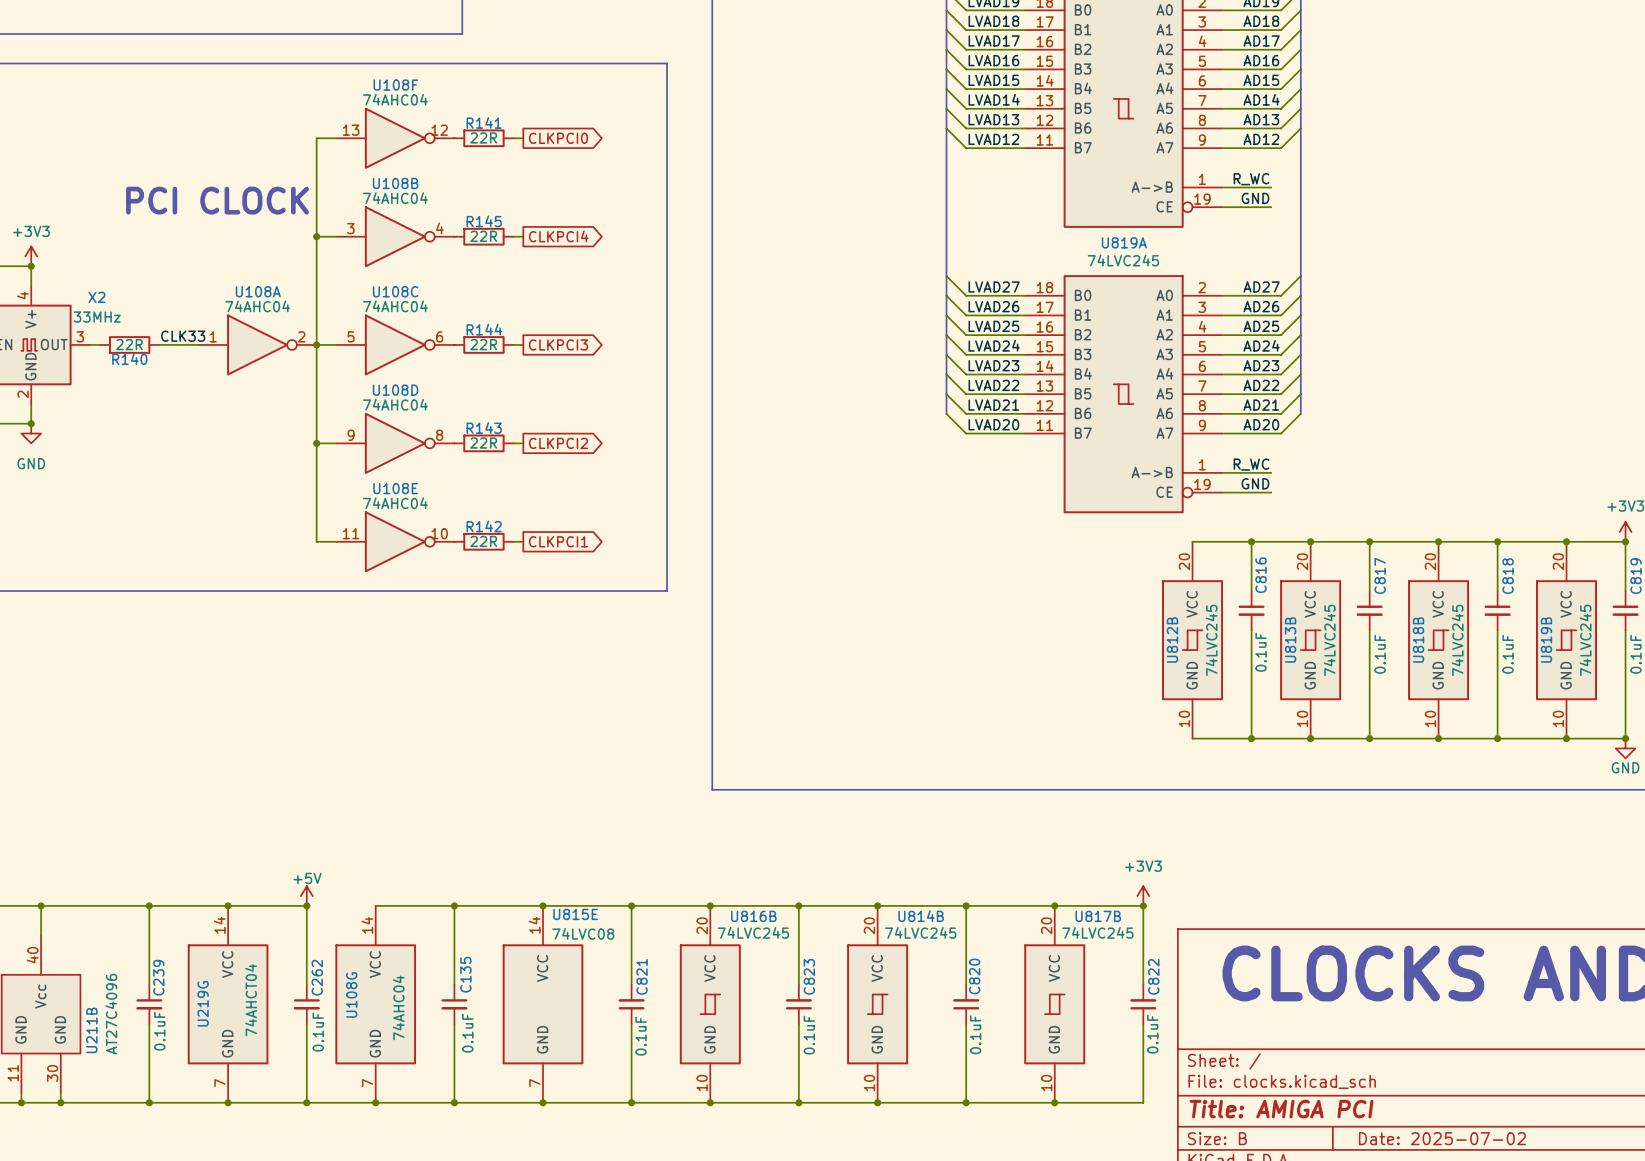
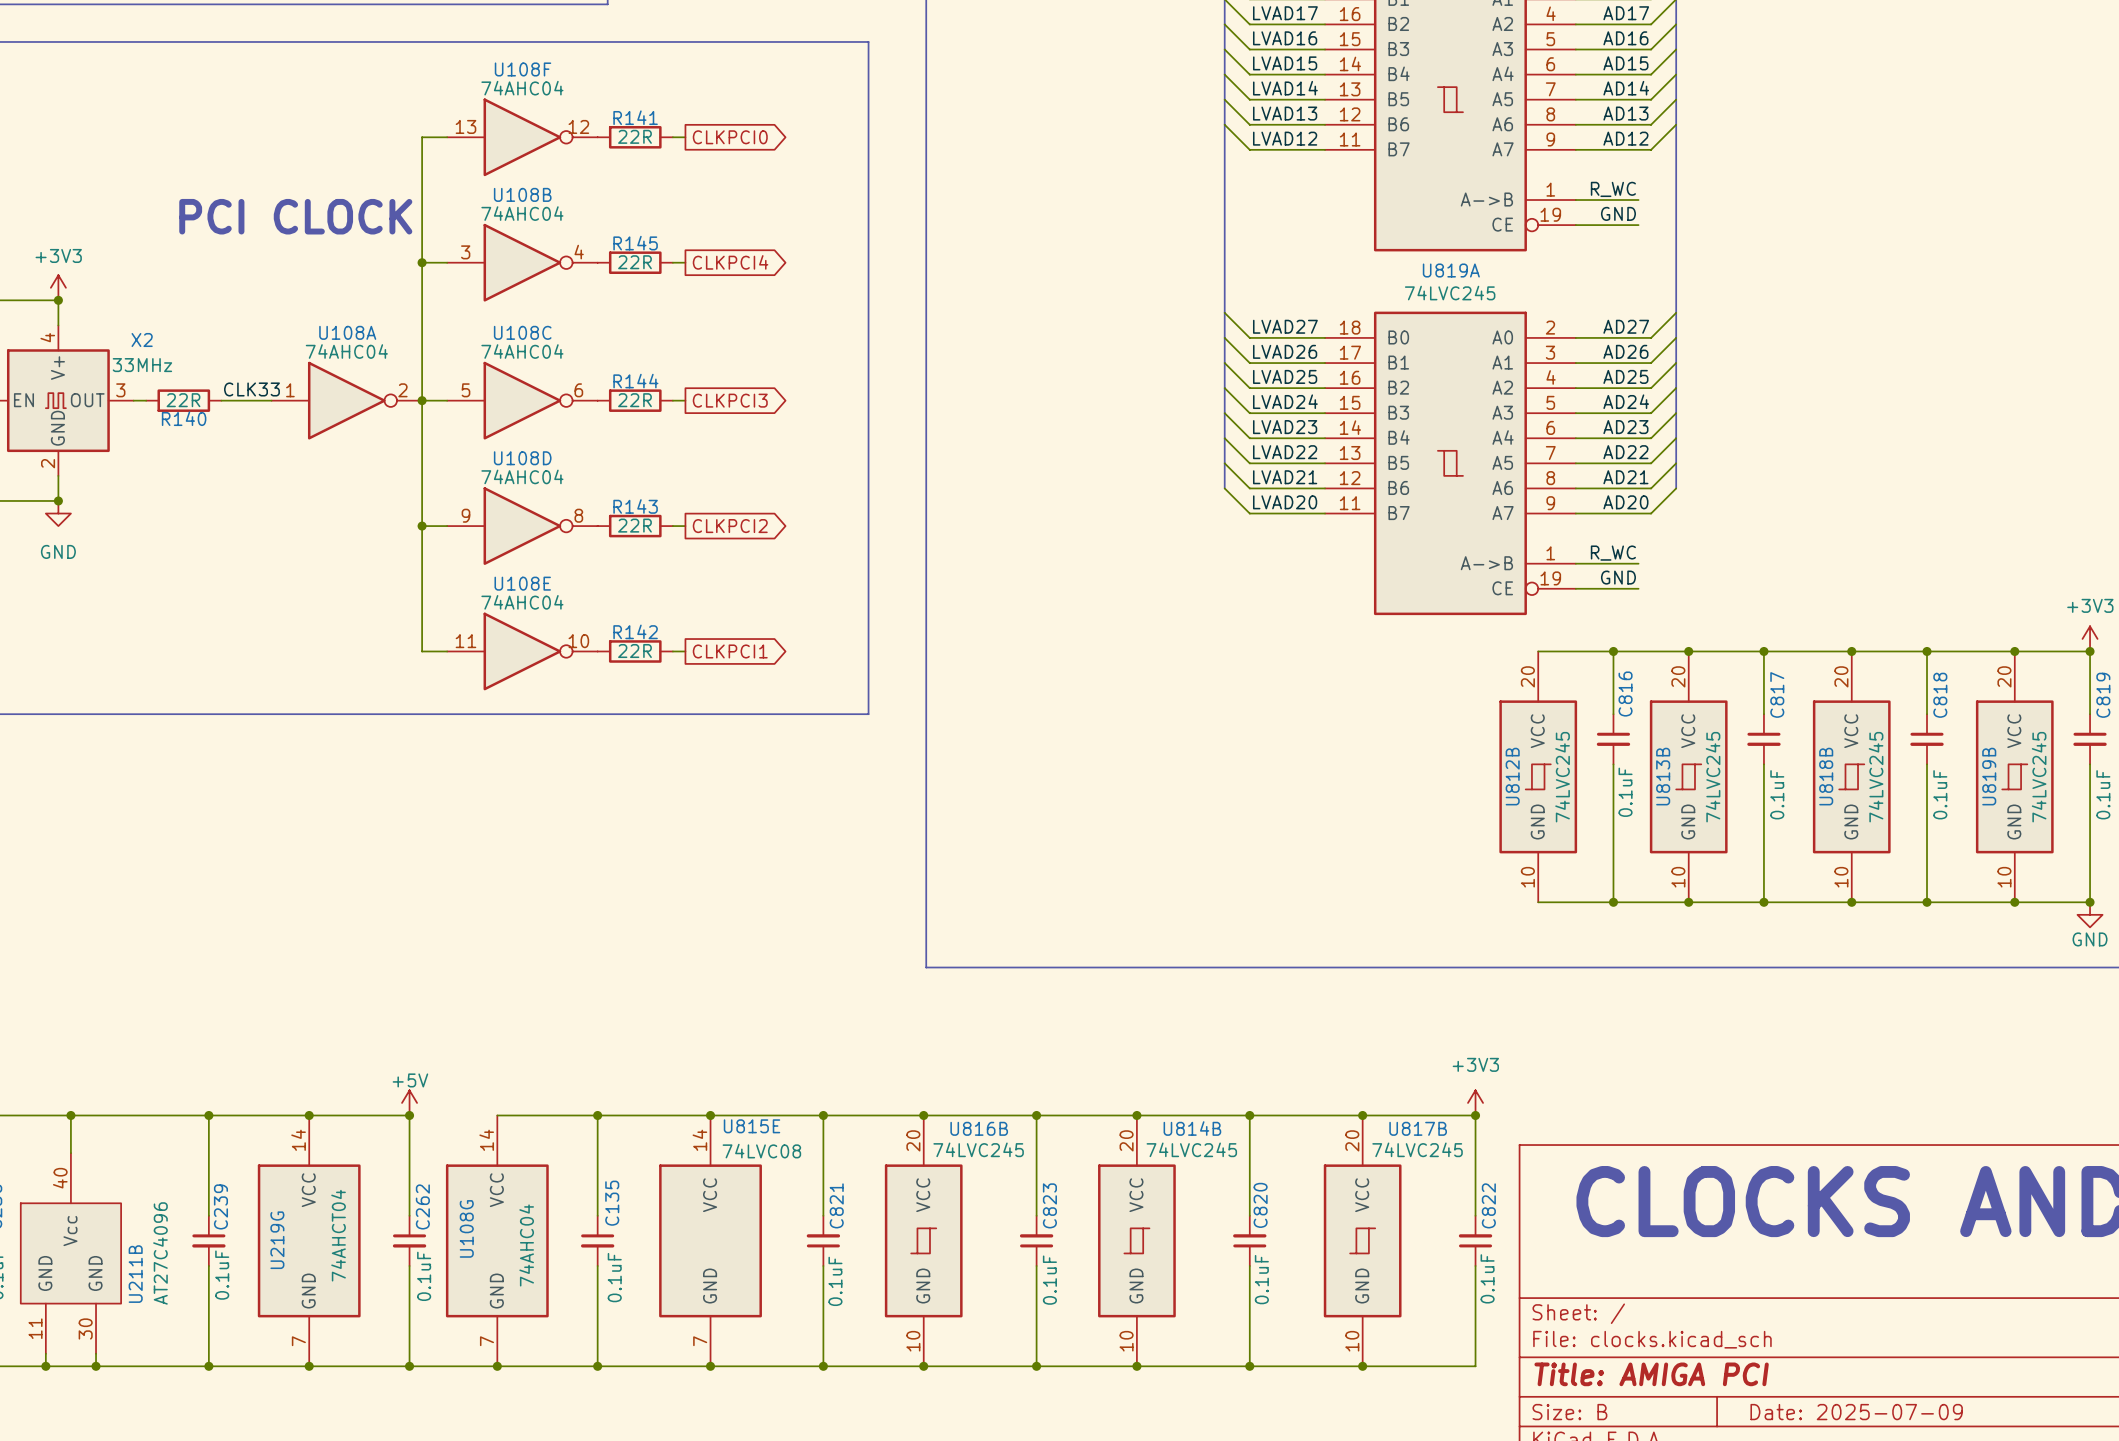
title block: Date: 2025-07-02 (1442, 1138) -> Date: 2025-07-09 (1856, 1412)

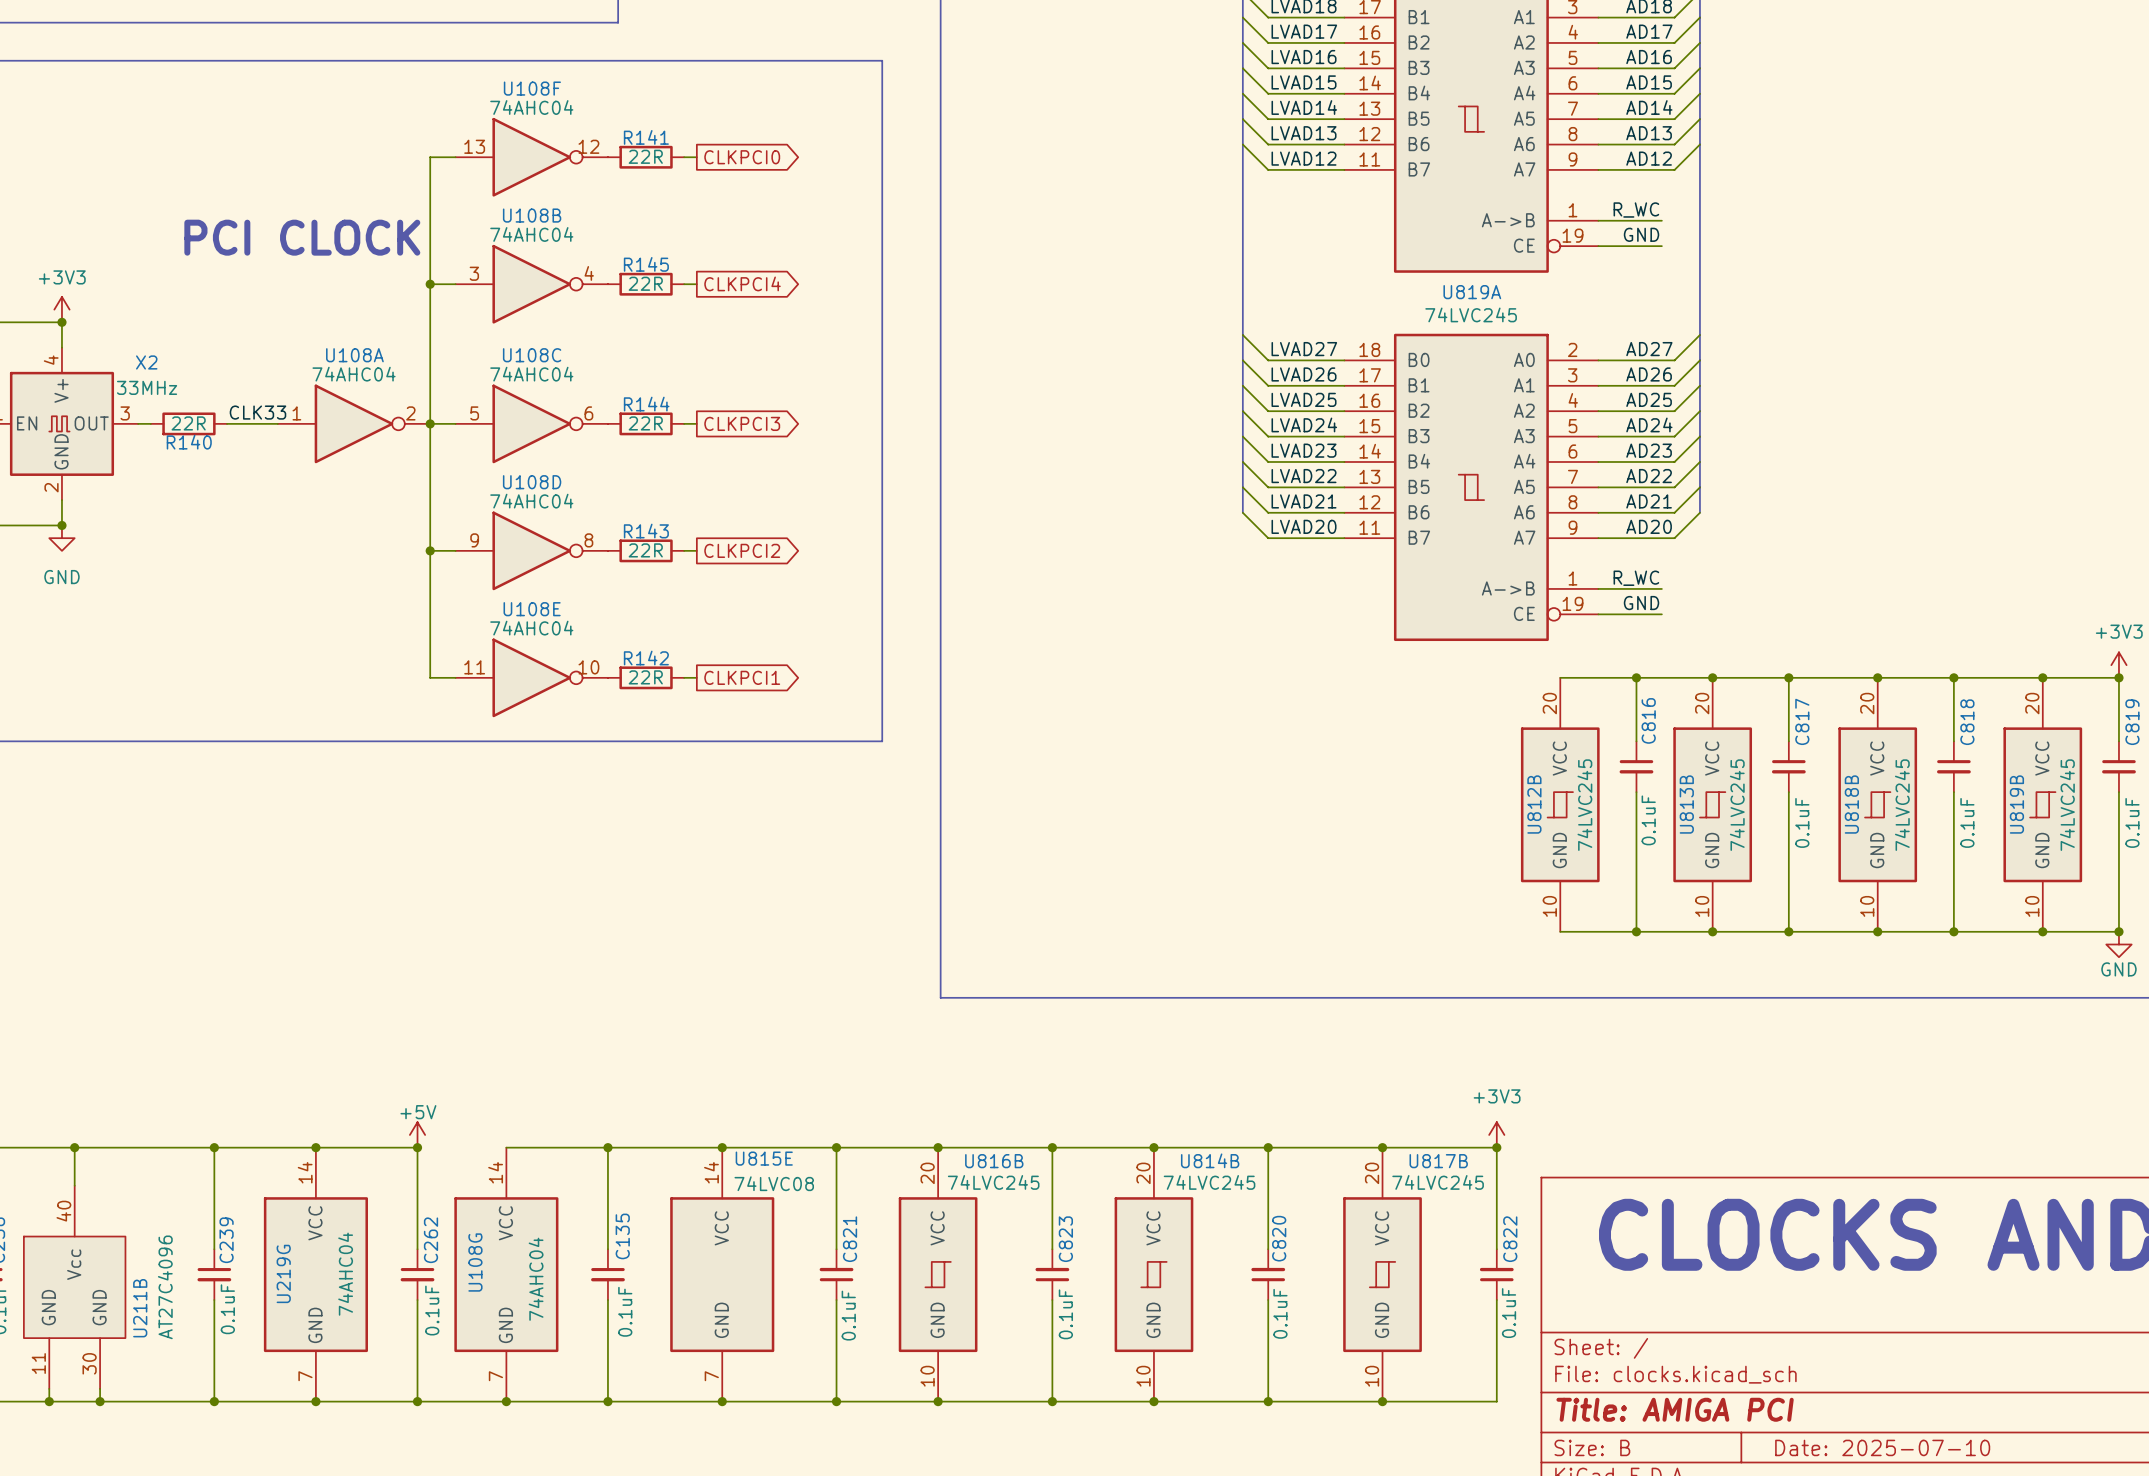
U219G value: 74AHCT04 (338, 1235) -> 74AHC04 (345, 1274)
title block: Date: 2025-07-09 (1856, 1412) -> Date: 2025-07-10 (1882, 1447)

